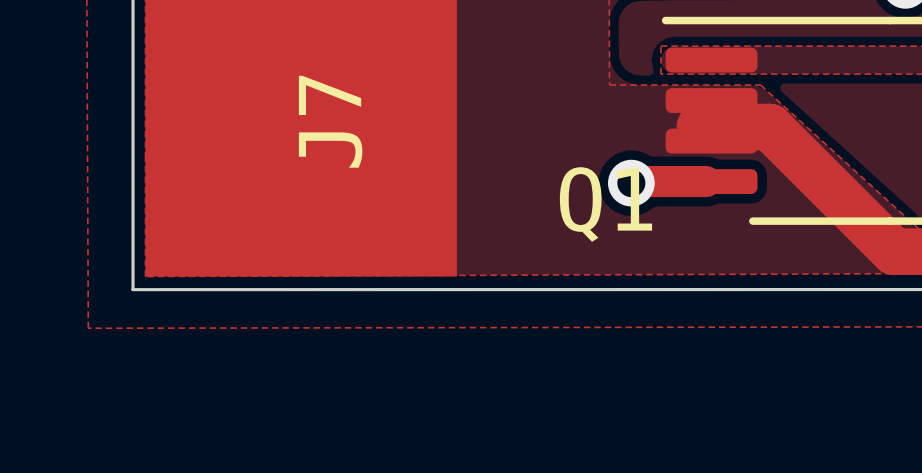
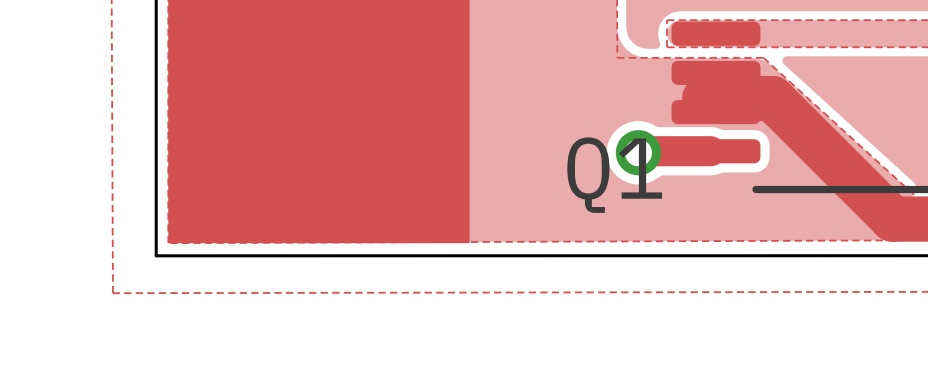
J7 name: J7 (330, 121) -> none

